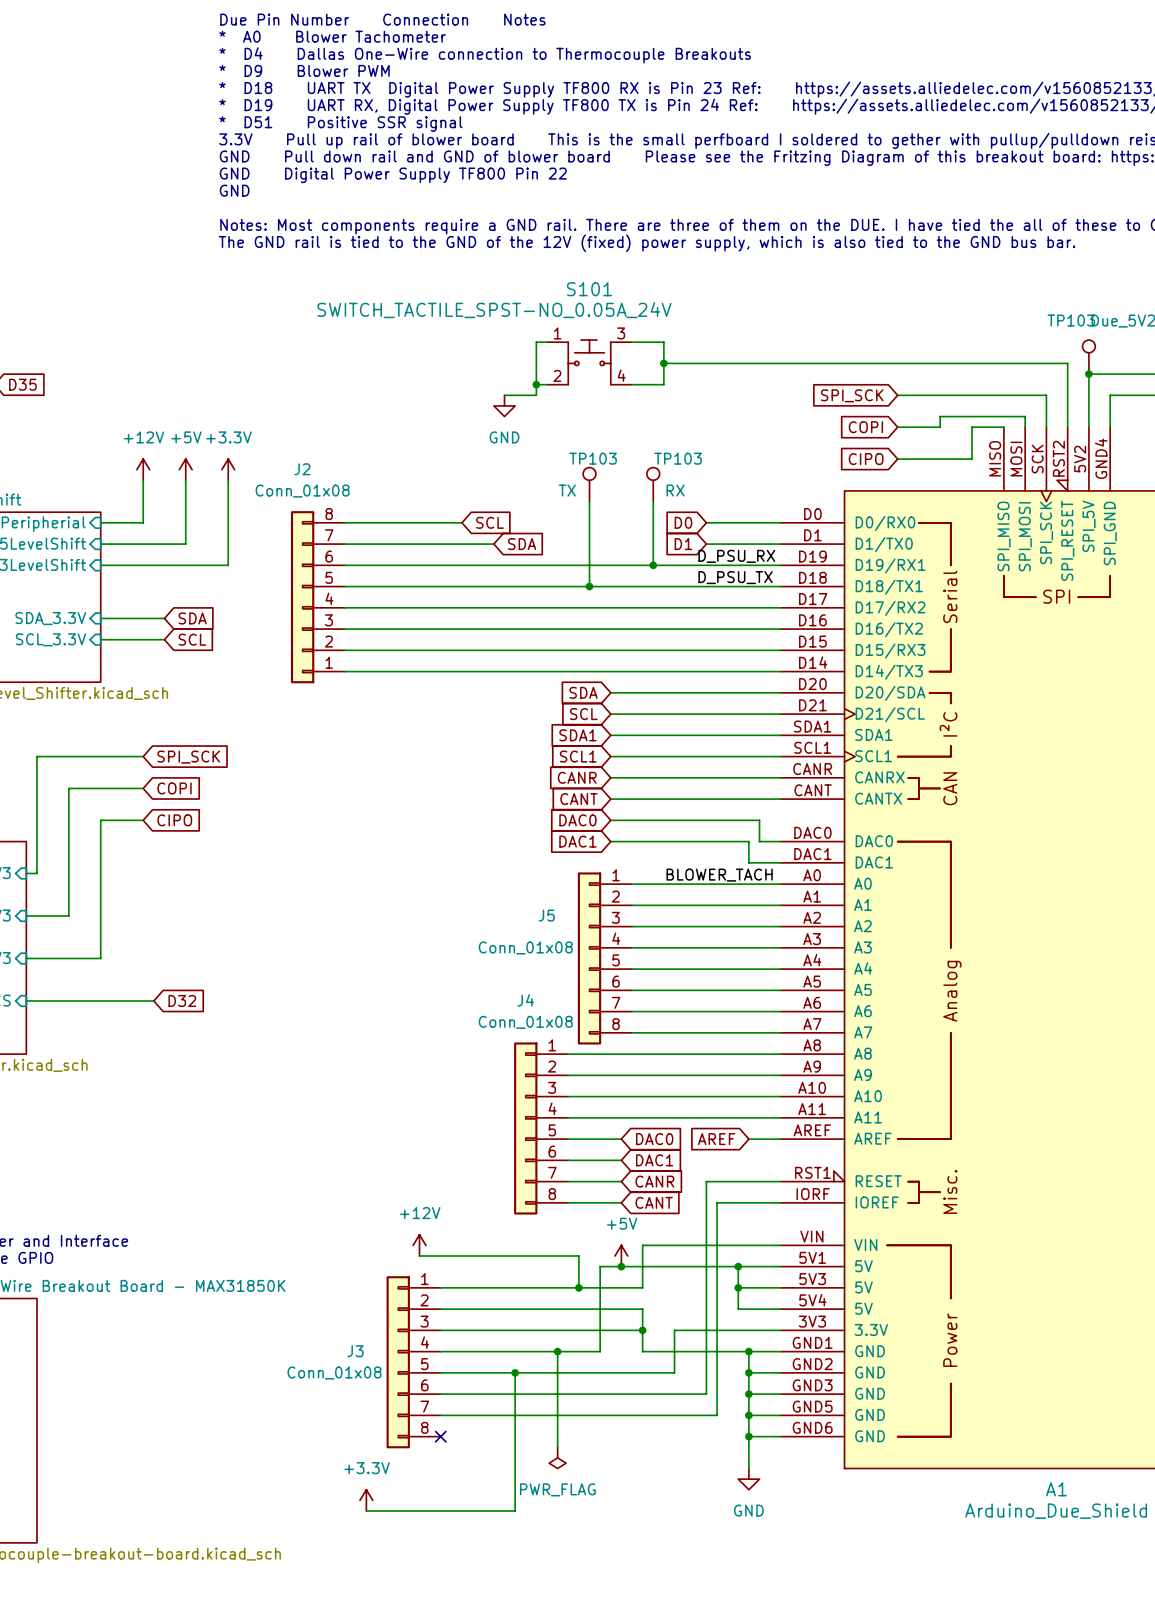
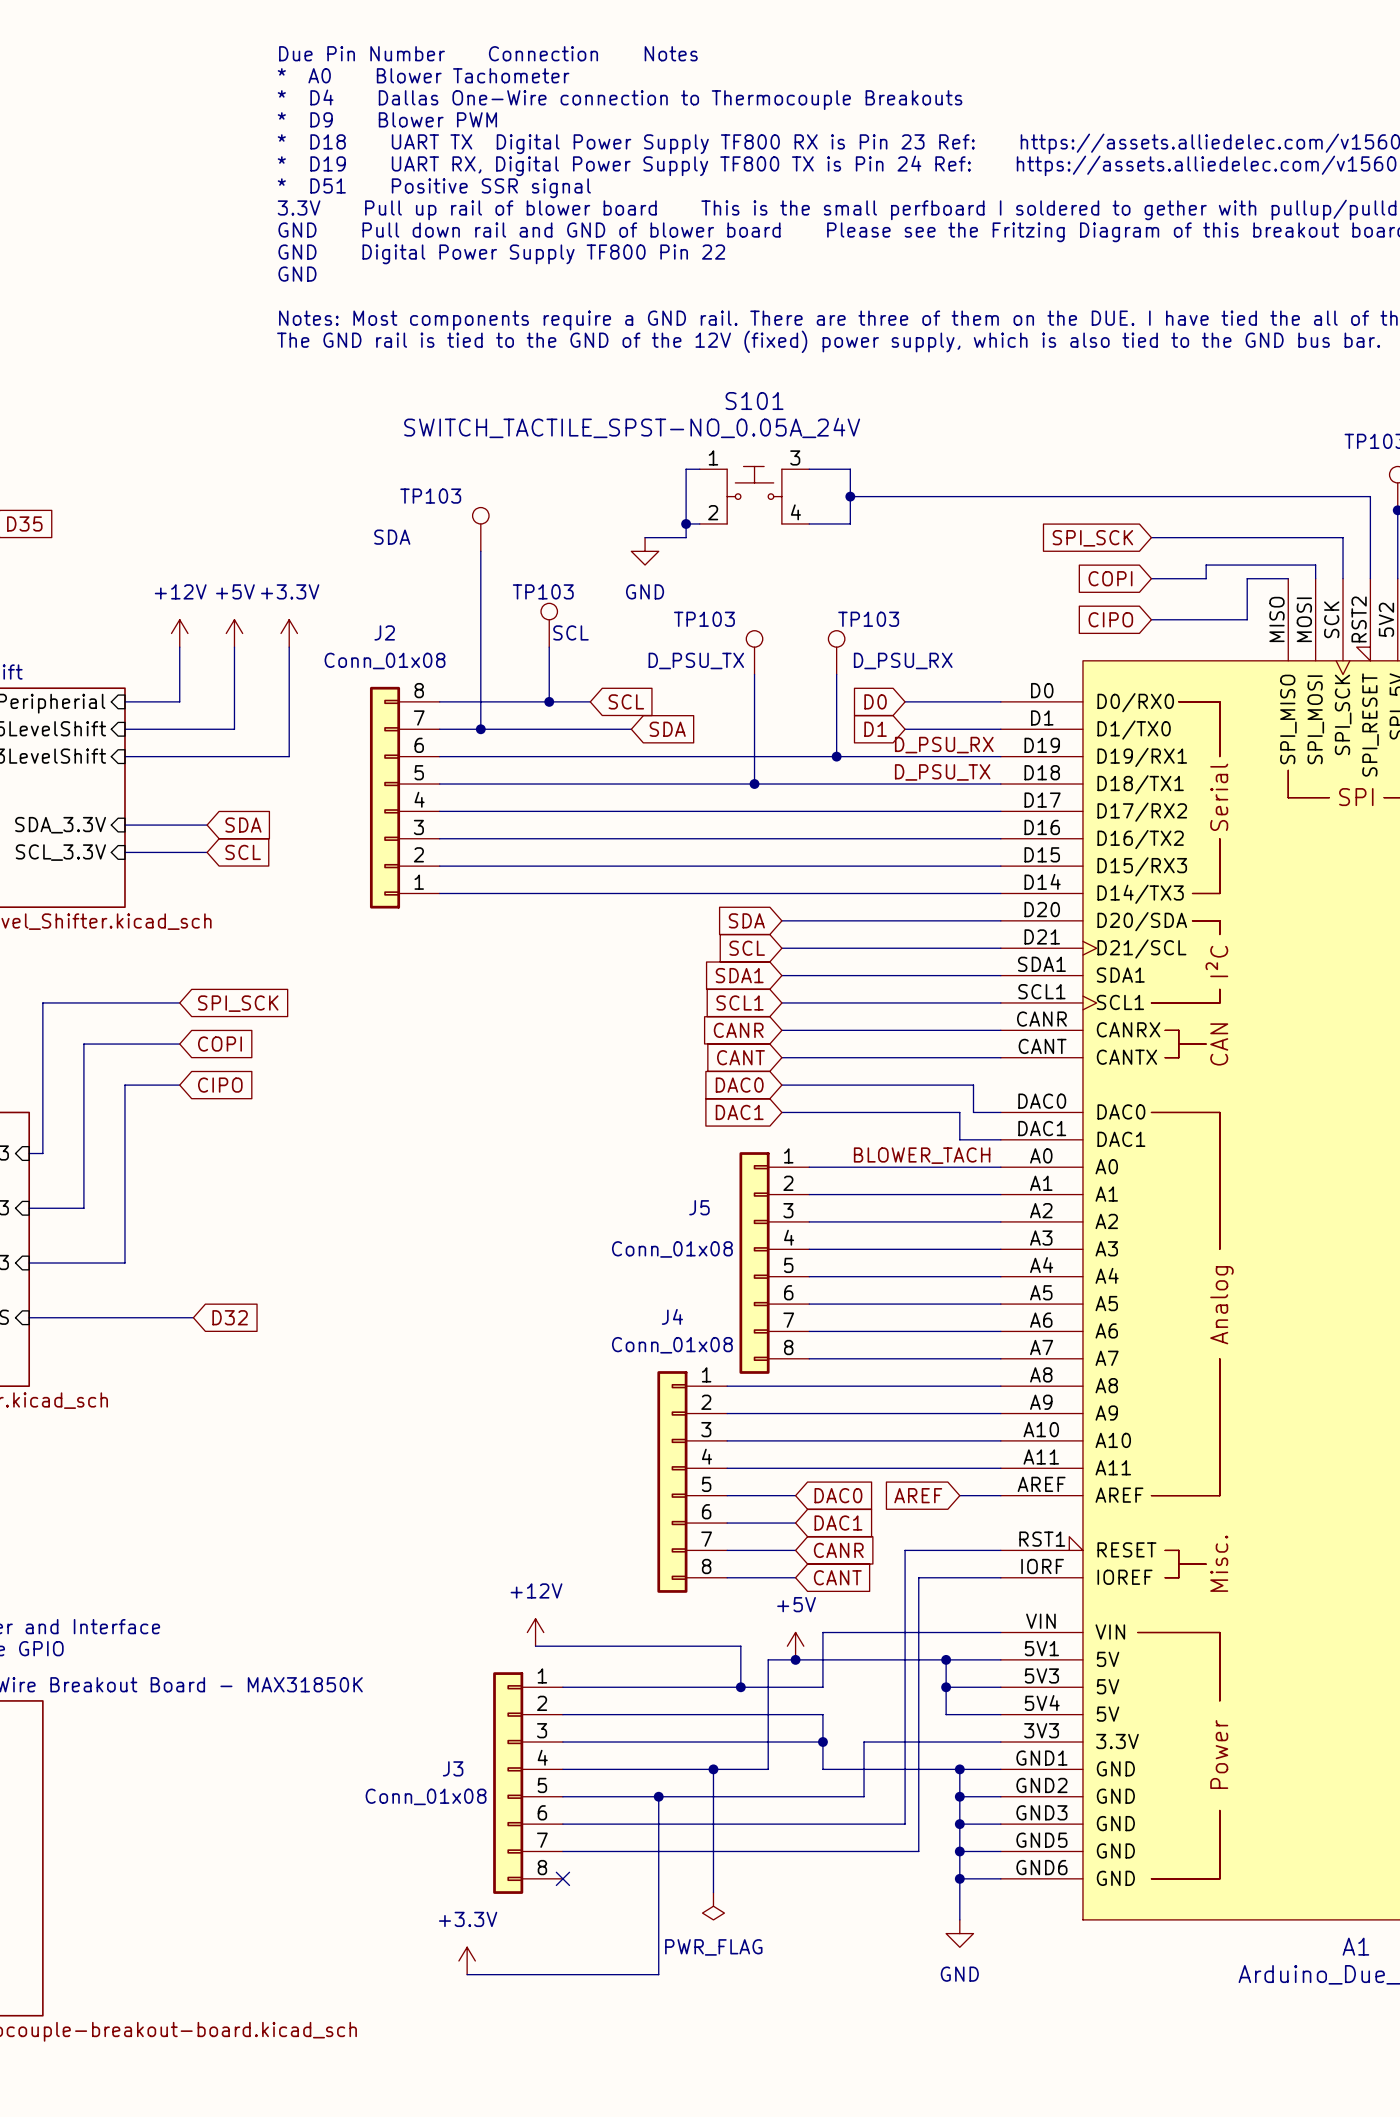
TP103: none -> SDA (480, 529)
wire: none -> (480, 551) (480, 729)
TP103 name position: TP103 (593, 458) -> TP103 (704, 619)
TP103: none -> SCL (549, 625)
wire: none -> (549, 647) (549, 701)
TP103 value: TX (567, 490) -> D_PSU_TX (696, 660)
TP103 value: RX (675, 490) -> D_PSU_RX (903, 660)
junction: none -> (549, 701)
junction: none -> (480, 729)

